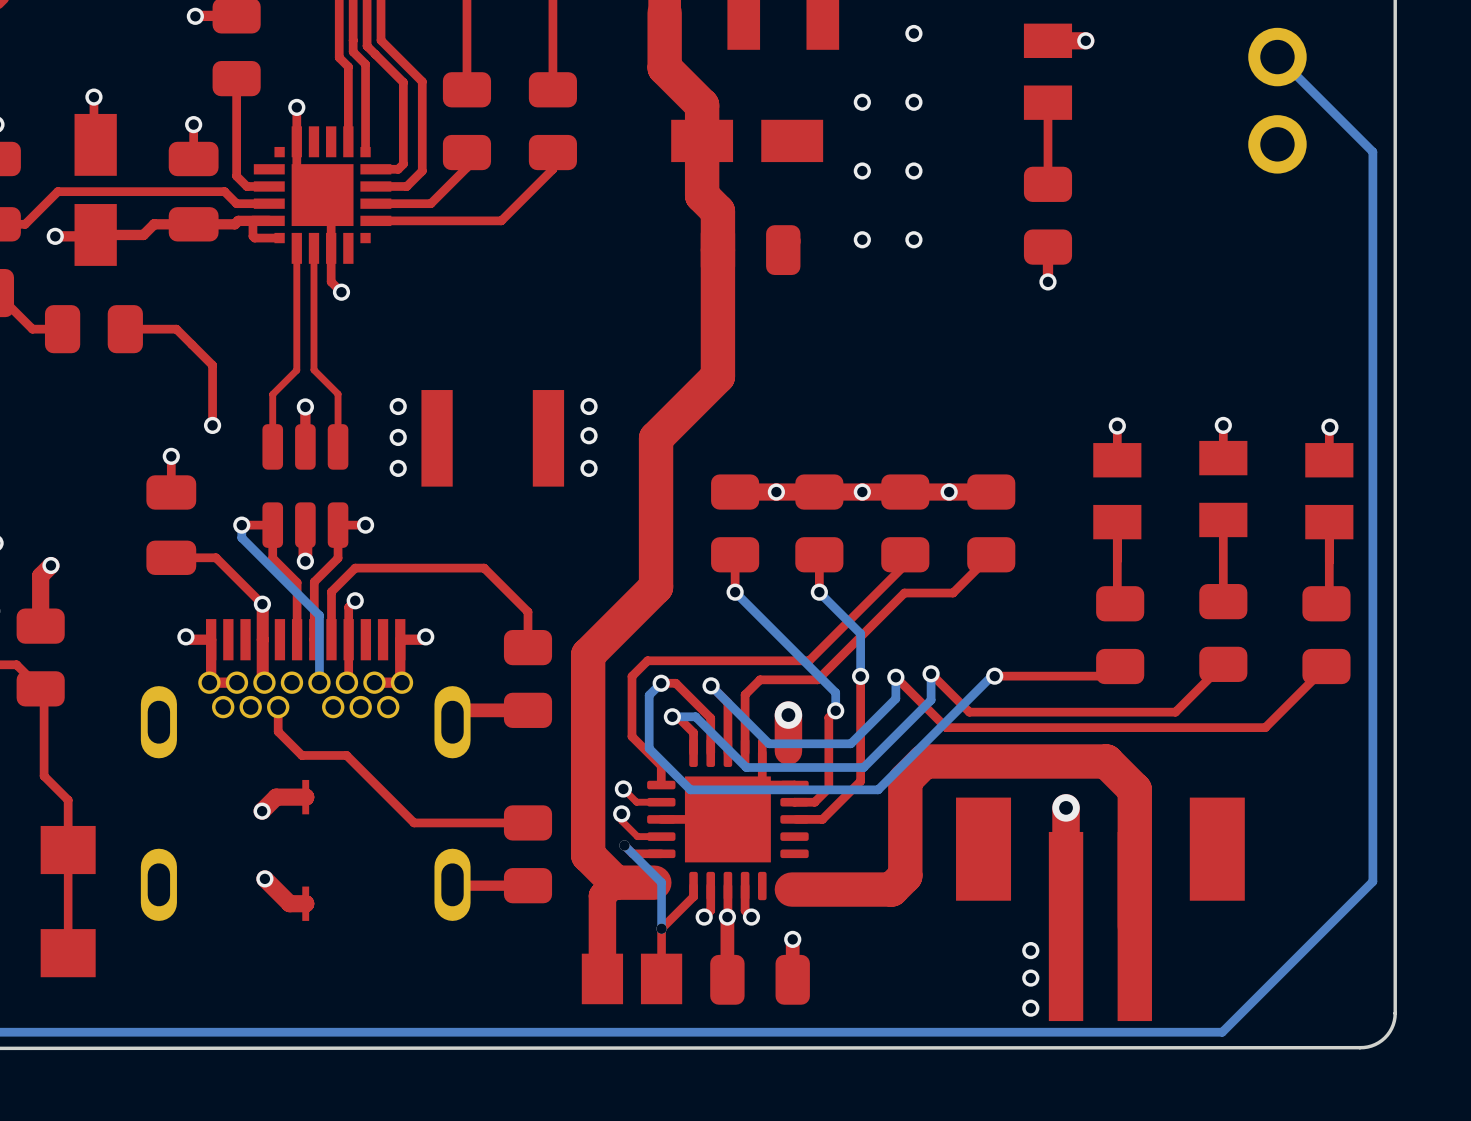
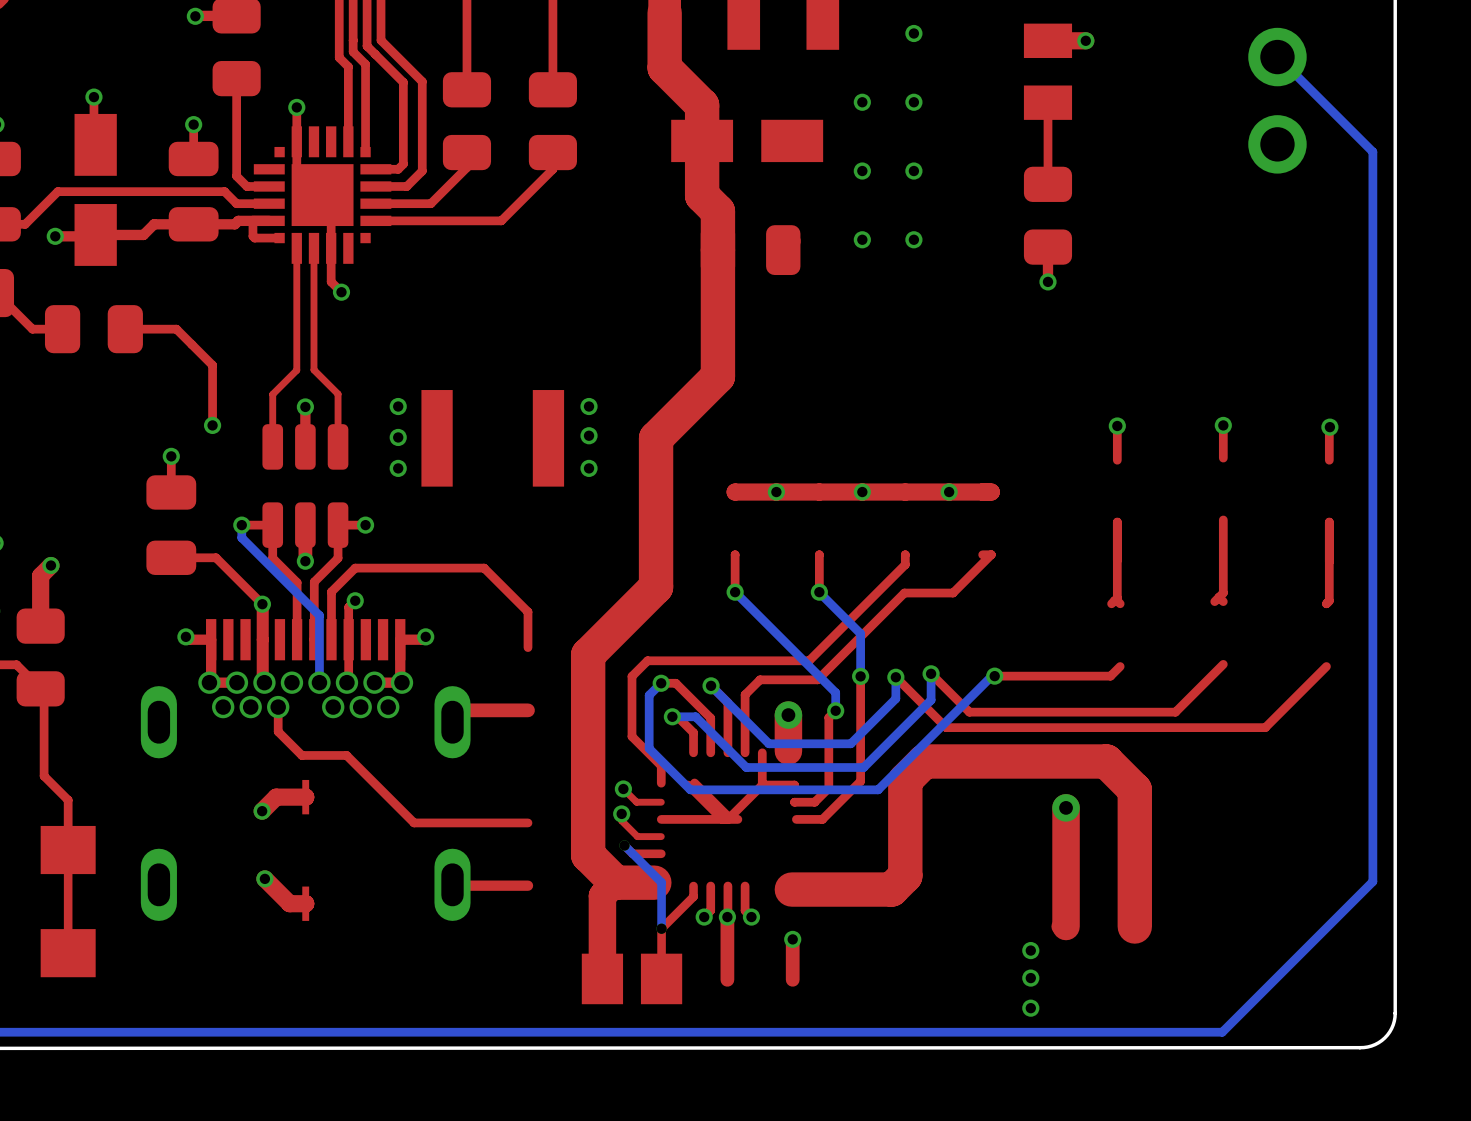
part: (1223, 489) -> none
part: (1117, 491) -> none
part: (1329, 491) -> none
part: (735, 523) -> none
part: (819, 523) -> none
part: (905, 523) -> none
part: (991, 523) -> none
part: (1223, 632) -> none
part: (1120, 635) -> none
part: (1326, 635) -> none
part: (528, 678) -> none
part: (727, 819) -> none
part: (528, 854) -> none
part: (1100, 909) -> none
part: (760, 979) -> none

